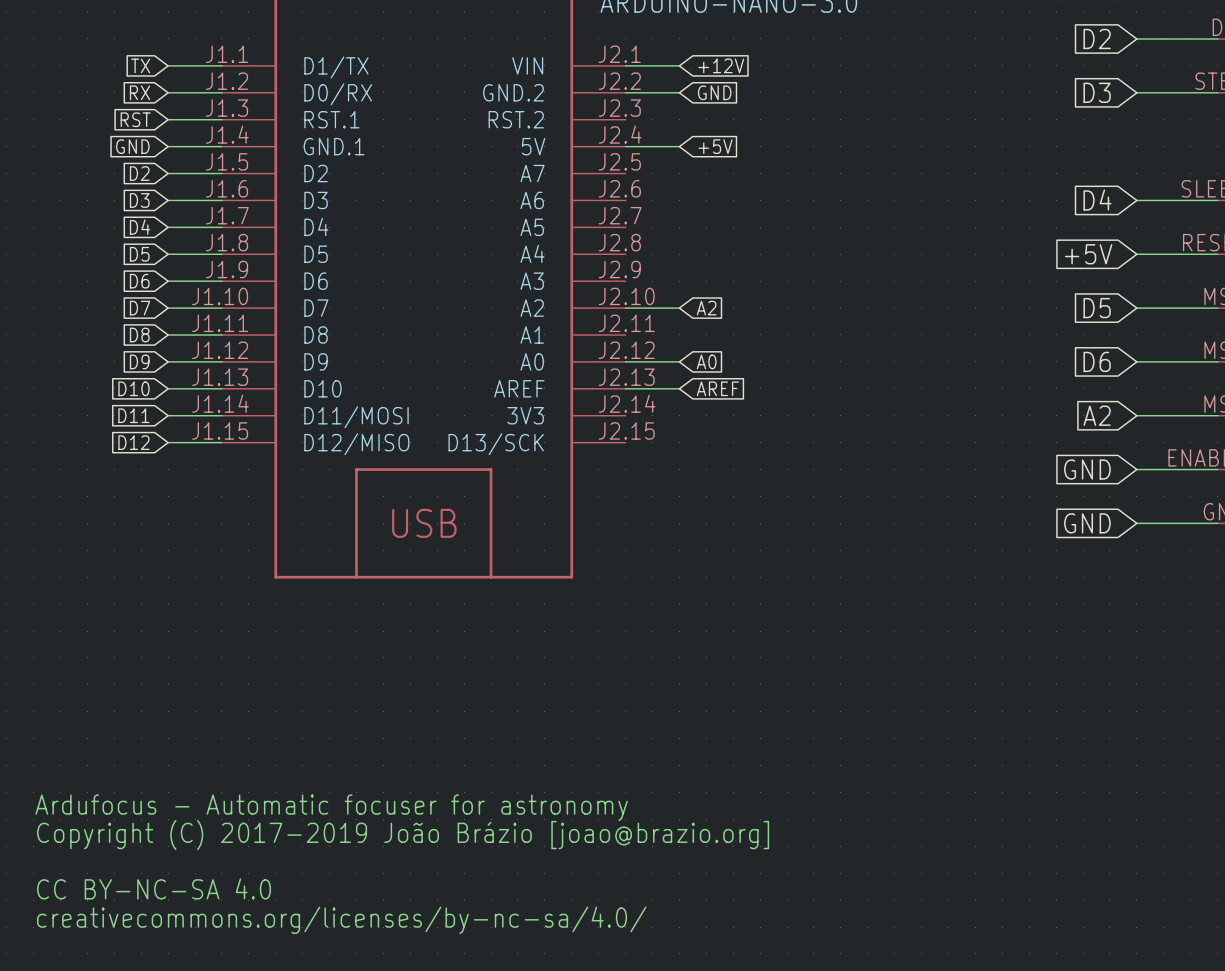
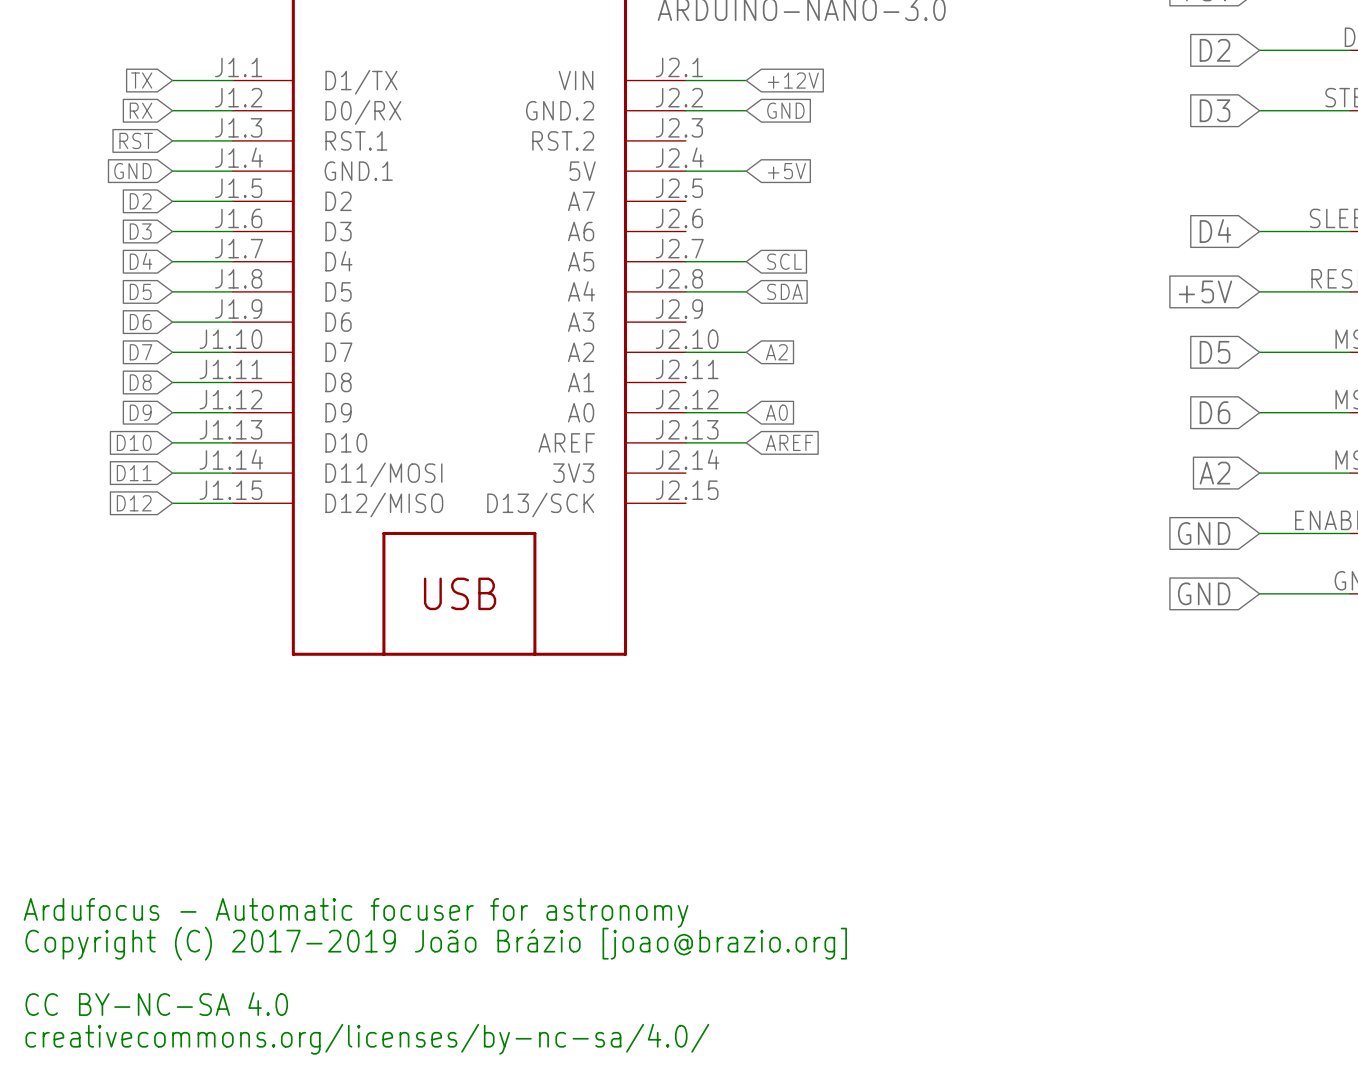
wire: none -> (685, 261) (746, 261)
global label: none -> SCL (784, 261)
wire: none -> (685, 291) (746, 291)
global label: none -> SDA (784, 291)

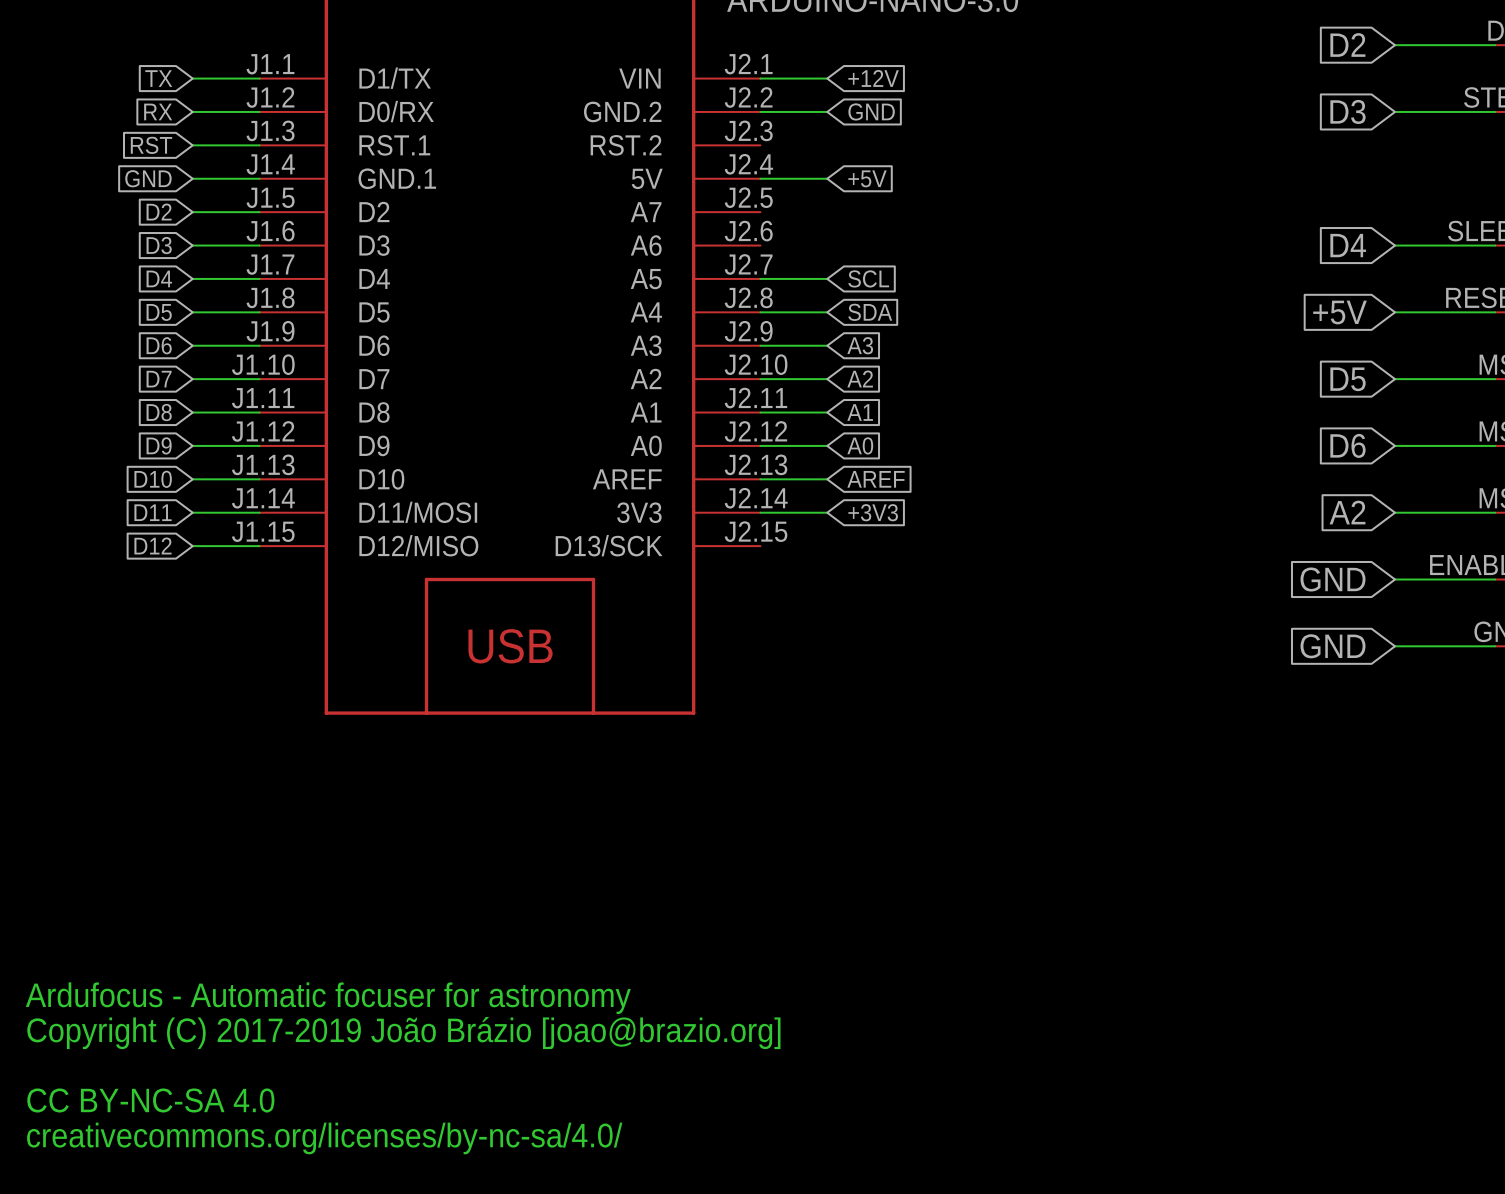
wire: none -> (760, 345) (827, 345)
global label: none -> A3 (860, 345)
wire: none -> (760, 412) (827, 412)
global label: none -> A1 (860, 412)
wire: none -> (760, 512) (827, 512)
global label: none -> +3V3 (873, 512)

